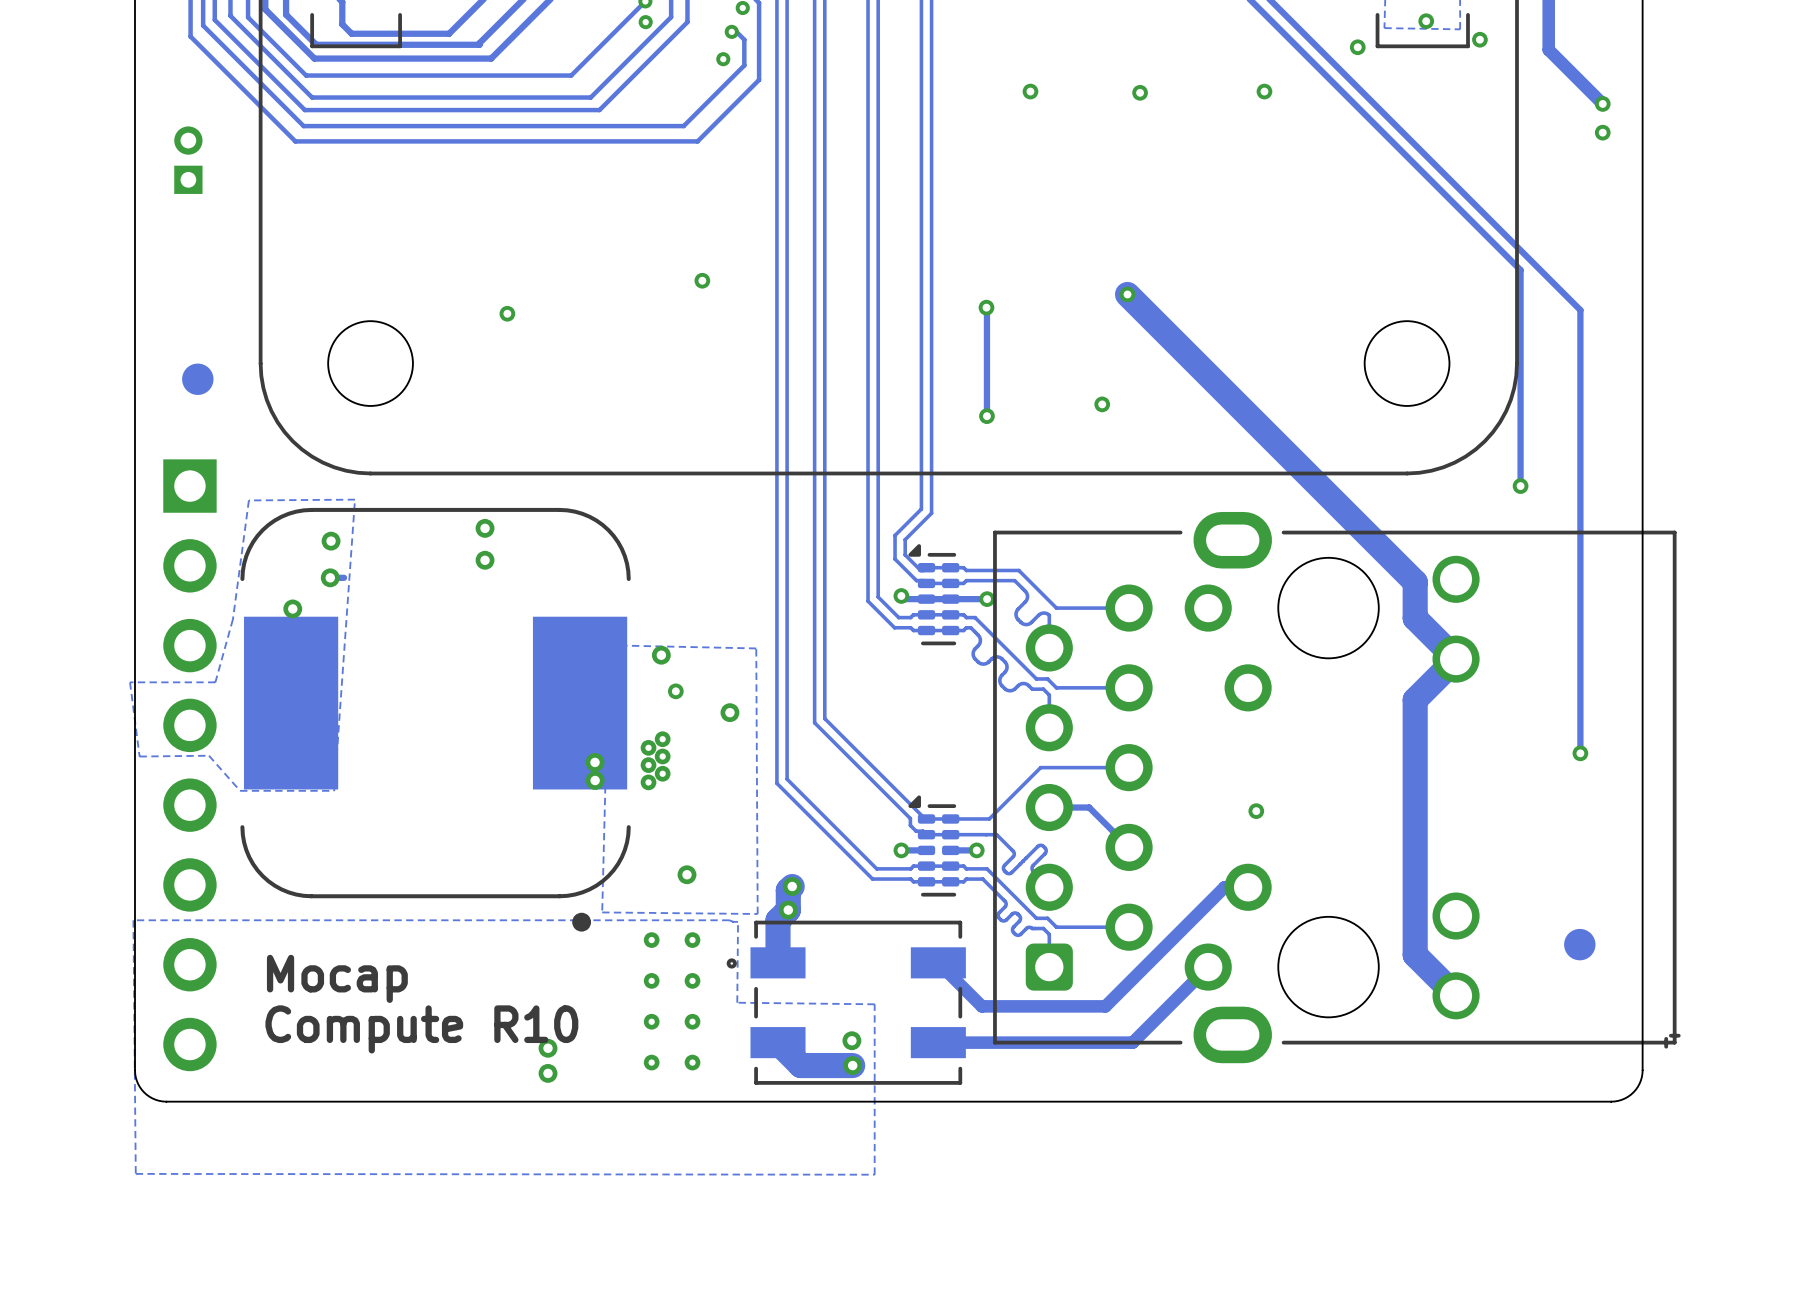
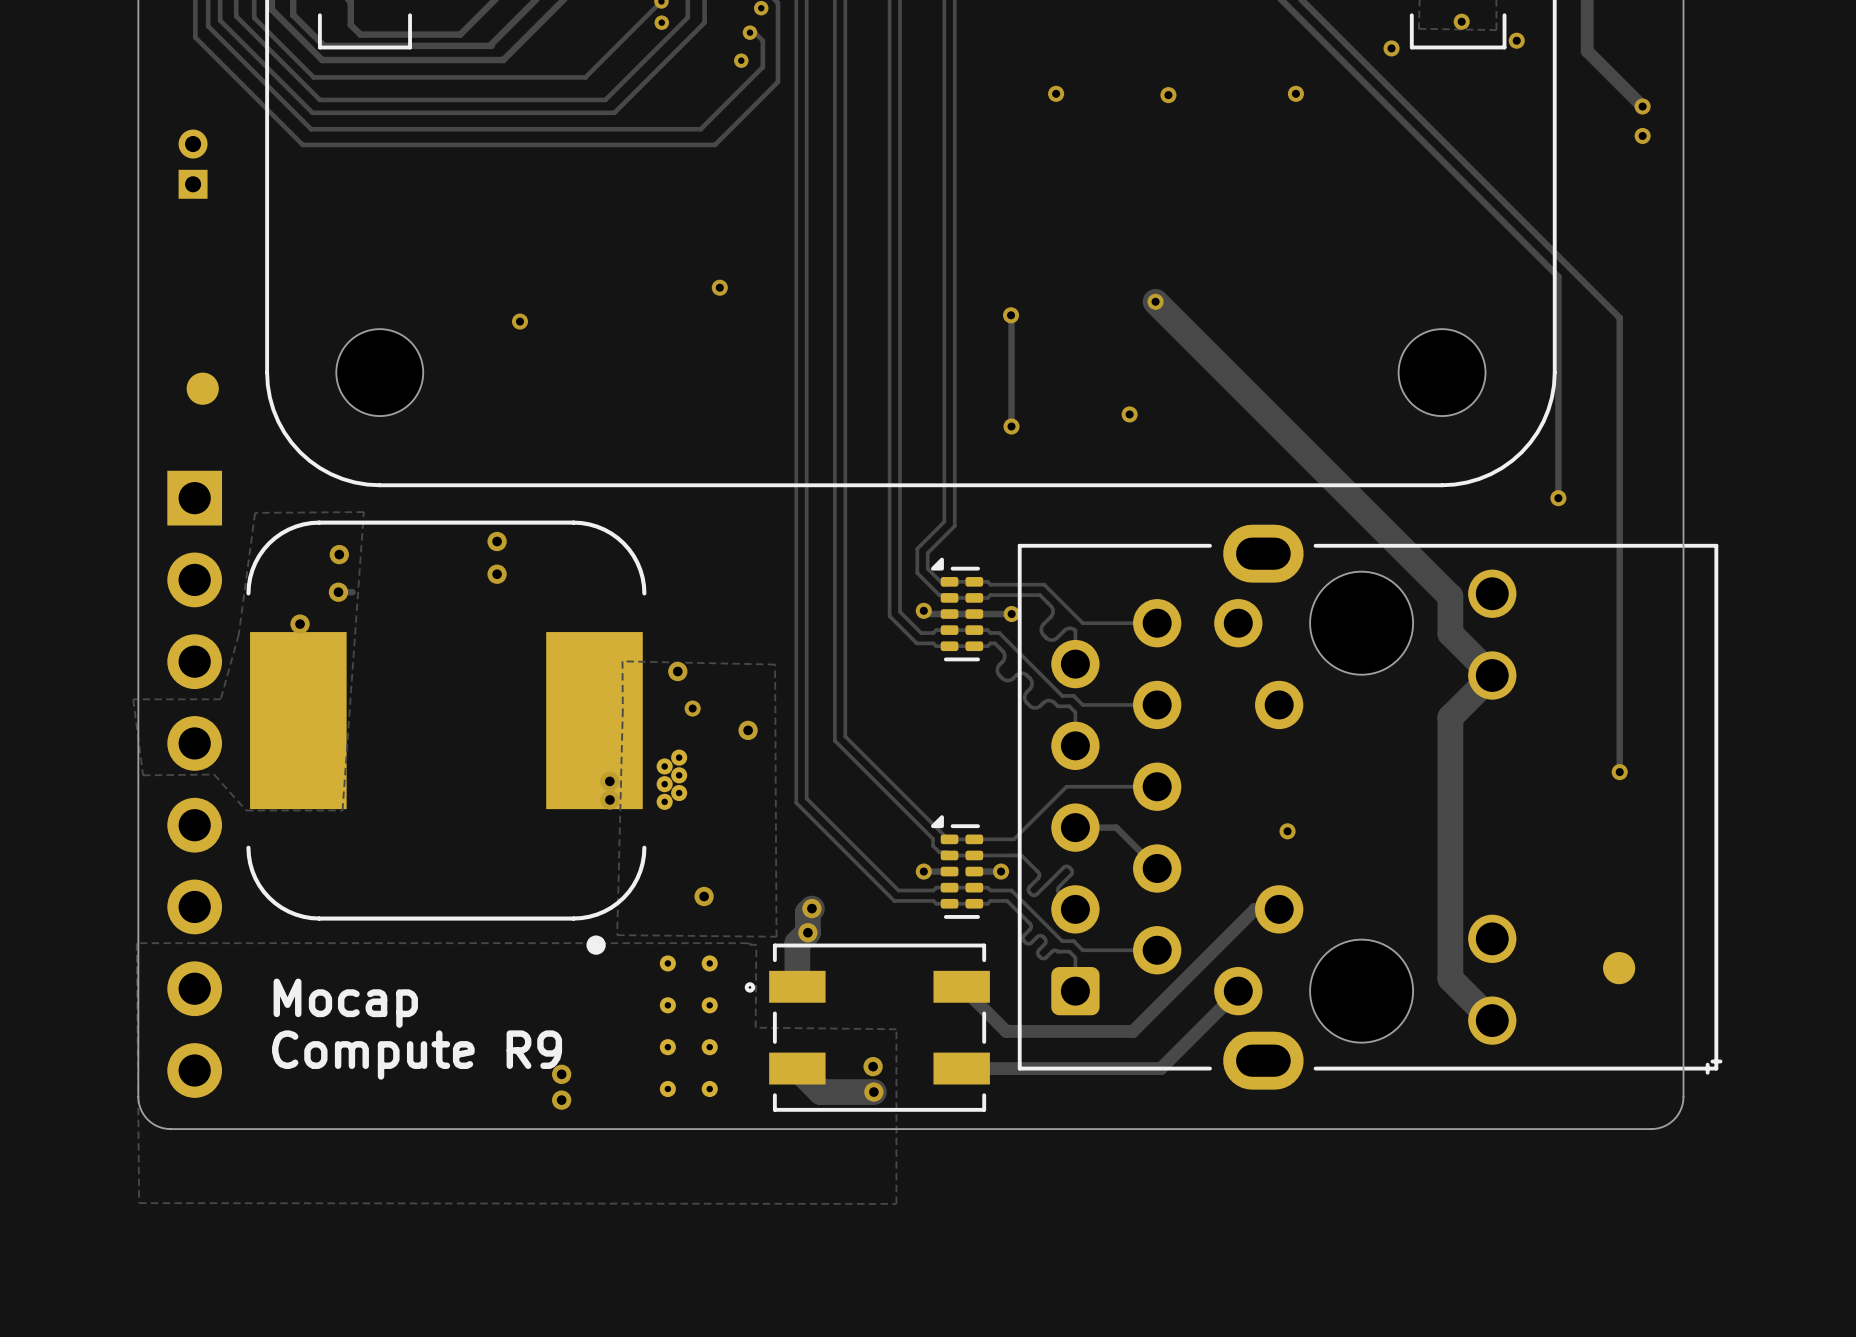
text: Compute R10 (421, 1029) -> Compute R9 (417, 1055)

